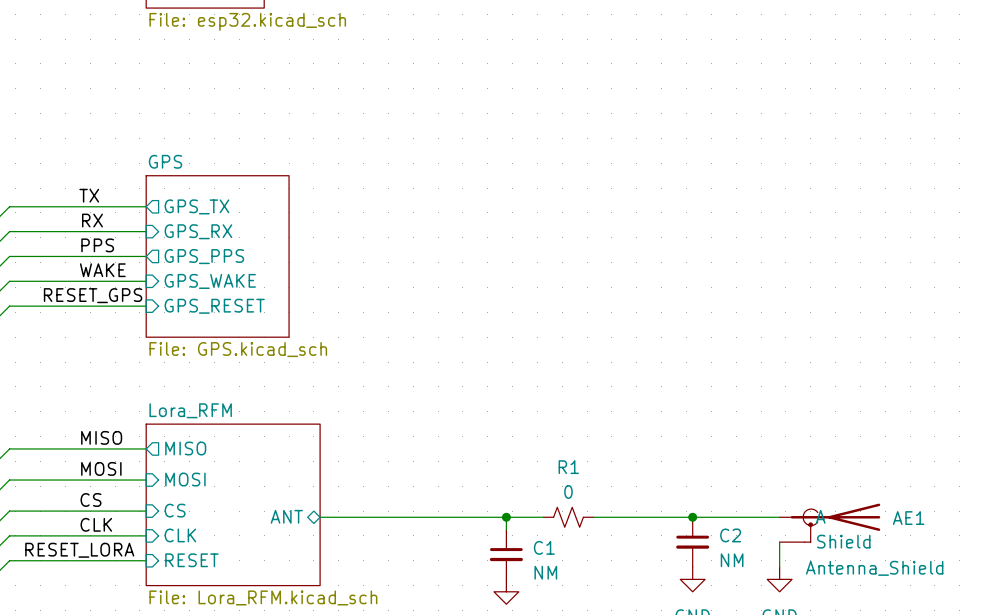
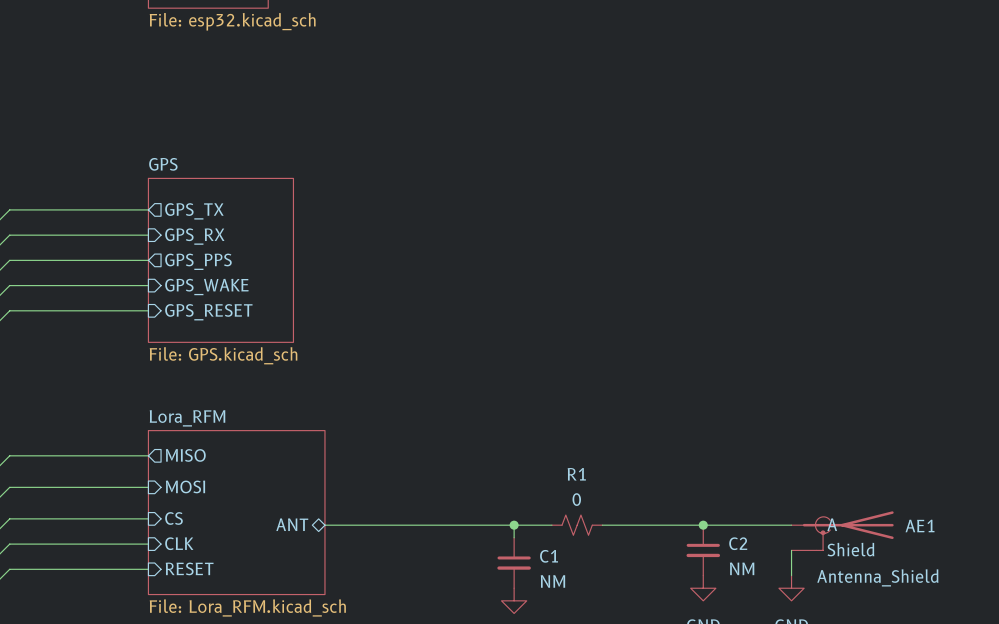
label: TX (89, 195) -> none
label: RX (92, 220) -> none
label: PPS (97, 245) -> none
label: WAKE (102, 270) -> none
label: RESET_GPS (93, 295) -> none
label: MISO (101, 437) -> none
label: MOSI (101, 468) -> none
label: CS (90, 499) -> none
label: CLK (96, 524) -> none
label: RESET_LORA (79, 550) -> none

